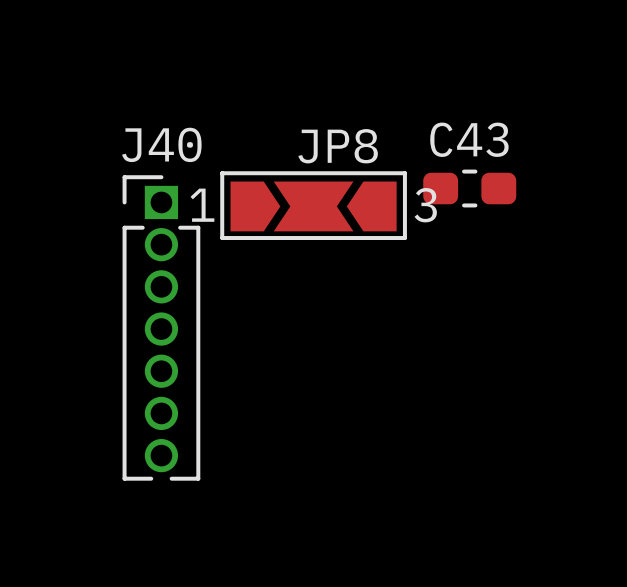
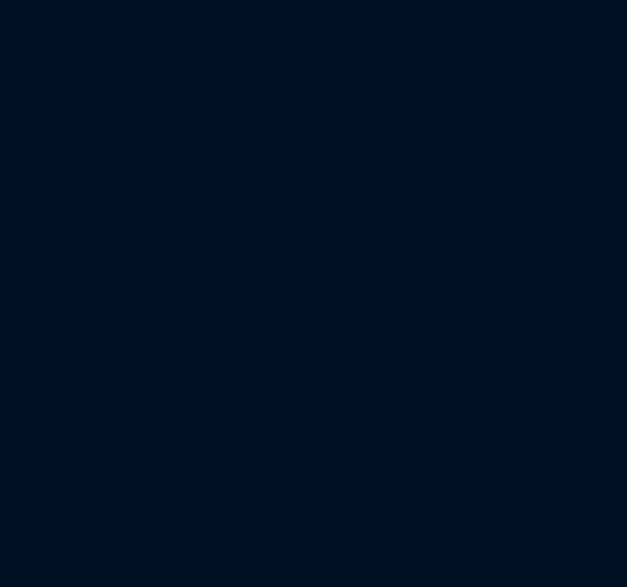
C43: (469, 188) -> none
JP8: (313, 205) -> none
J40: (161, 327) -> none

